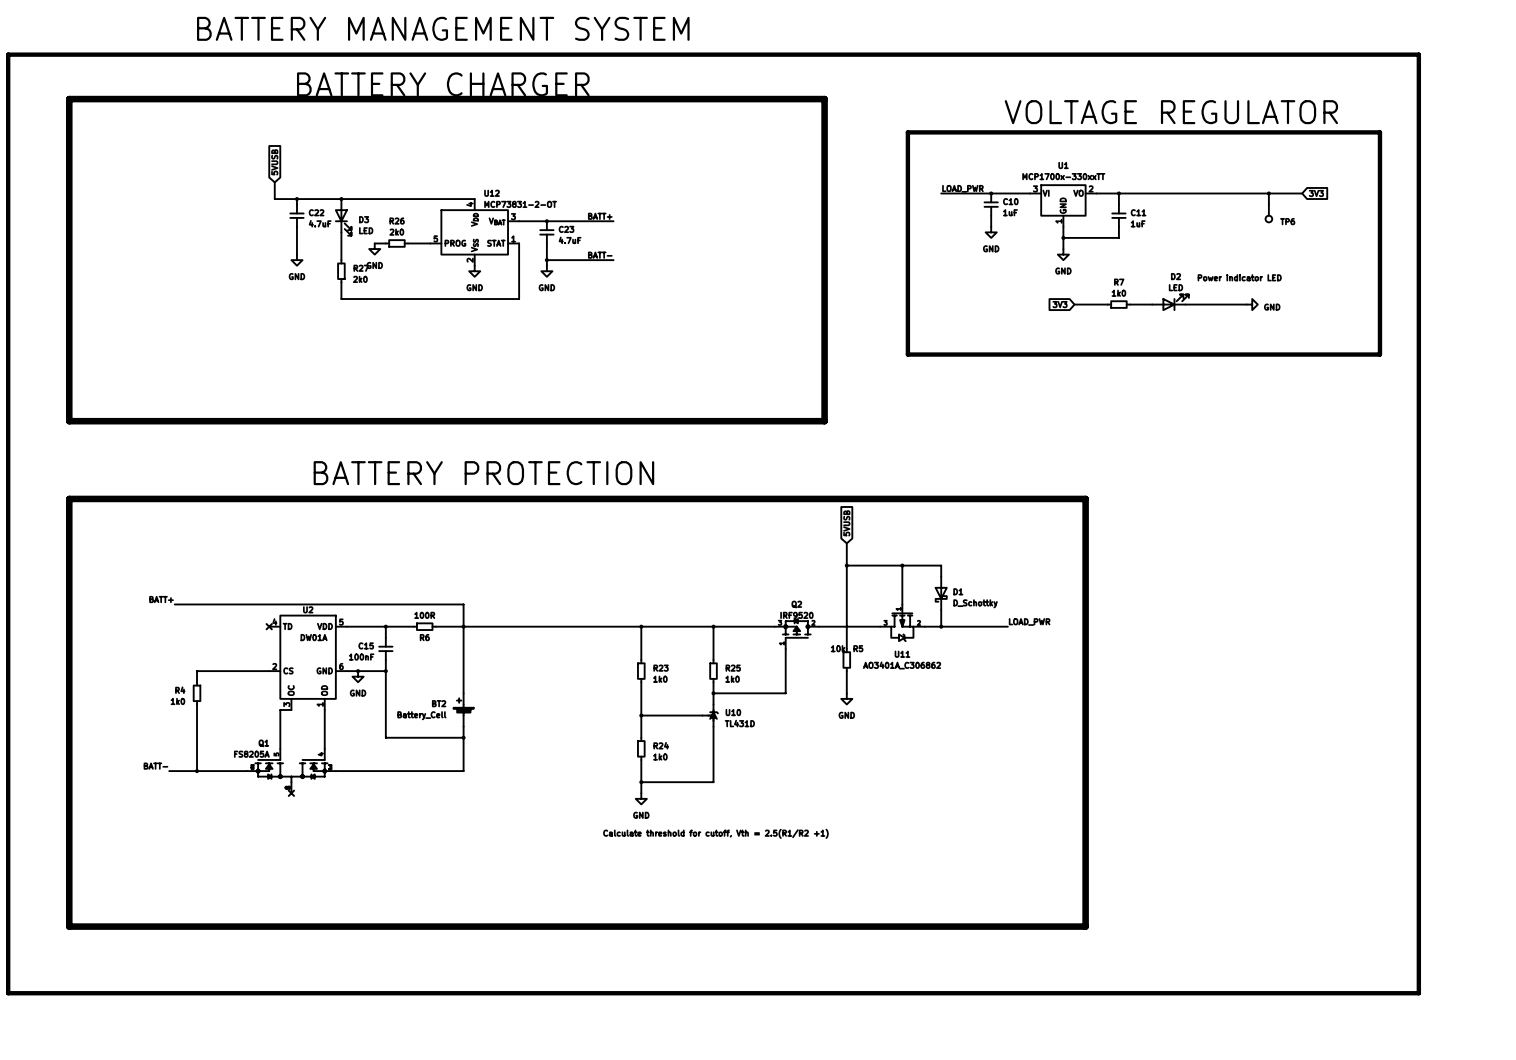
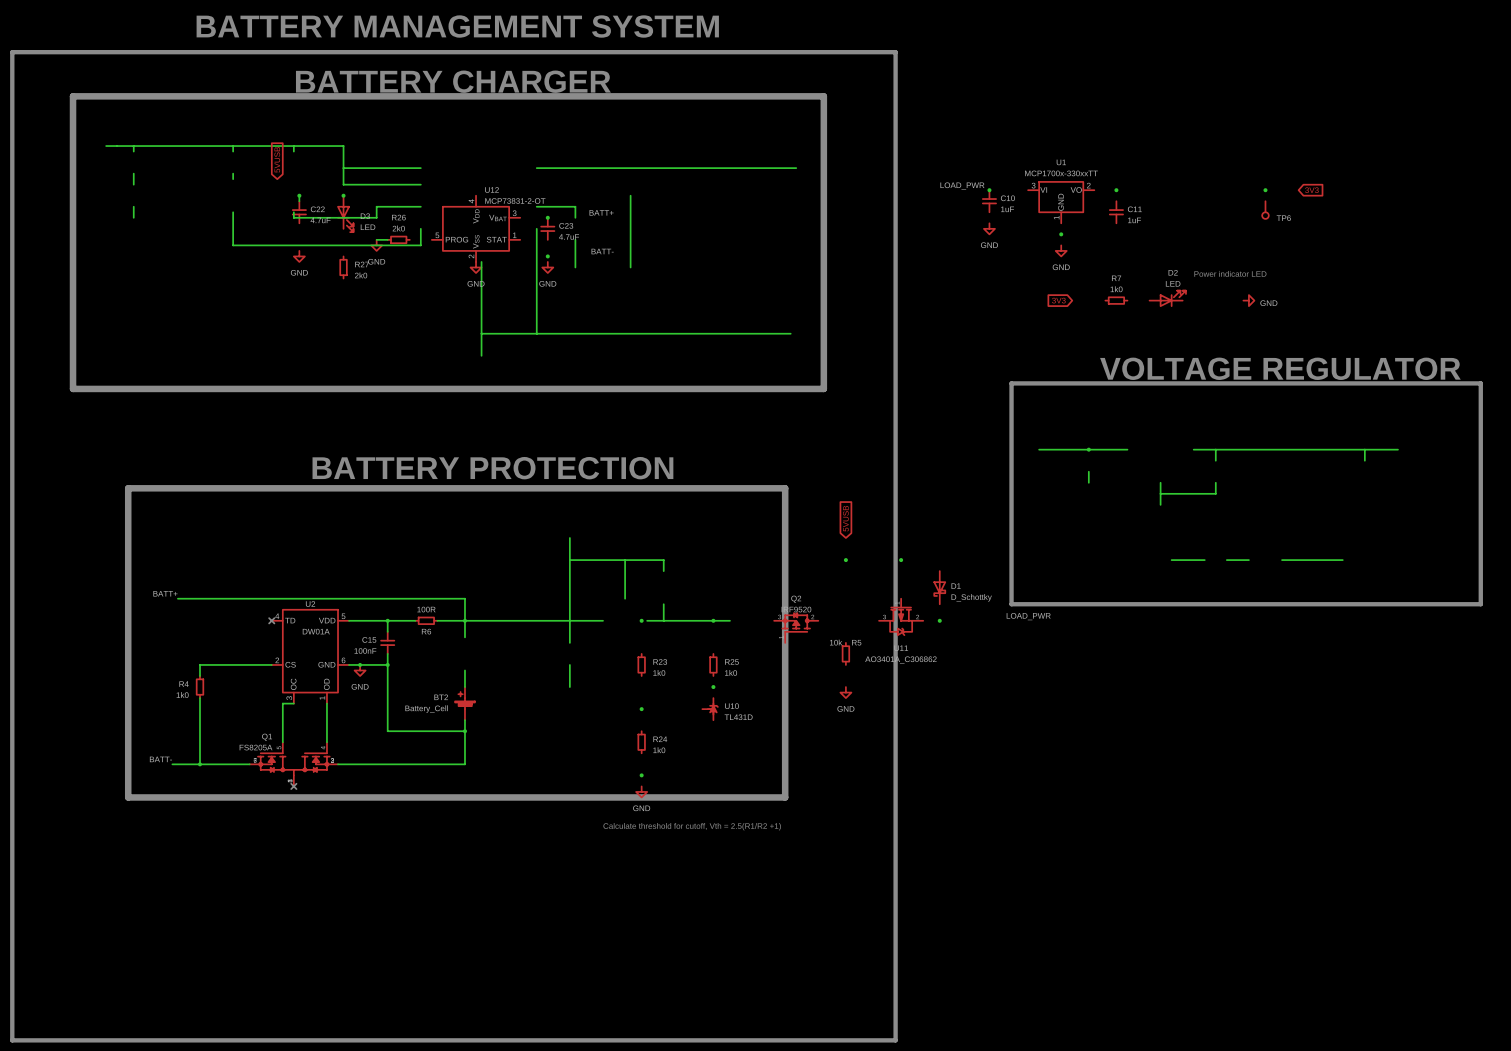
line: (896, 54) (1418, 54) (1418, 993) (8, 993) -> (895, 52) (895, 1040) (12, 1040) (12, 985)
text: VOLTAGE REGULATOR (1171, 112) -> none
line: (907, 132) (1379, 132) (1379, 354) (907, 354) (907, 132) -> none
wire: none -> (106, 146) (343, 146) (343, 184) (420, 184)
wire: none -> (133, 146) (133, 151)
wire: none -> (233, 146) (233, 151)
wire: none -> (293, 146) (293, 151)
wire: none -> (343, 168) (420, 168)
wire: none -> (536, 168) (796, 168)
wire: none -> (133, 173) (133, 184)
wire: none -> (233, 173) (233, 179)
wire: (274, 182) (274, 199) (474, 199) -> none
wire: (941, 193) (1030, 193) -> none
wire: (1096, 193) (1302, 193) -> none
wire: (1118, 193) (1118, 204) -> none
wire: (1268, 193) (1268, 204) -> none
wire: none -> (630, 195) (630, 267)
wire: none -> (133, 206) (133, 217)
wire: none -> (420, 206) (376, 206) (376, 217) (293, 217) (293, 212)
wire: none -> (536, 206) (575, 206) (575, 217)
wire: none -> (233, 212) (233, 245) (420, 245) (420, 228)
wire: (991, 215) (991, 226) -> none
wire: (519, 221) (613, 221) -> none
wire: (296, 226) (296, 254) -> none
wire: (1063, 226) (1063, 249) -> none
wire: (1118, 226) (1118, 237) (1063, 237) -> none
wire: (341, 232) (341, 260) -> none
wire: none -> (536, 228) (536, 333)
wire: (408, 243) (430, 243) -> none
wire: (519, 243) (519, 299) (341, 299) (341, 282) -> none
wire: (546, 243) (546, 265) -> none
wire: none -> (575, 239) (575, 267)
wire: (546, 260) (613, 260) -> none
wire: none -> (481, 261) (481, 355)
wire: (1074, 304) (1107, 304) -> none
wire: (1130, 304) (1152, 304) -> none
wire: (1185, 304) (1246, 304) -> none
wire: none -> (481, 333) (790, 333)
text: none -> VOLTAGE REGULATOR (1280, 368)
line: none -> (1011, 383) (1480, 383) (1480, 604) (1011, 604) (1011, 383)
line: (69, 393) (69, 421) (824, 421) (824, 393) -> (73, 388) (823, 388)
wire: none -> (1039, 449) (1127, 449)
junction: none -> (1088, 449)
wire: none -> (1193, 449) (1397, 449)
wire: none -> (1215, 449) (1215, 460)
wire: none -> (1364, 449) (1364, 460)
wire: none -> (1088, 471) (1088, 482)
wire: none -> (1160, 482) (1160, 504)
wire: none -> (1215, 482) (1215, 493) (1160, 493)
line: none -> (128, 488) (785, 488) (785, 797) (128, 797) (128, 488)
line: (69, 498) (1085, 498) (1085, 926) (69, 926) (69, 498) -> none
wire: none -> (569, 537) (569, 642)
wire: (846, 543) (846, 648) -> none
wire: none -> (569, 560) (663, 560) (663, 571)
wire: none -> (625, 560) (625, 598)
wire: (846, 565) (941, 565) (941, 576) -> none
wire: (902, 565) (902, 604) -> none
wire: none -> (1171, 560) (1204, 560)
wire: none -> (1226, 560) (1248, 560)
wire: none -> (1282, 560) (1342, 560)
wire: none -> (663, 604) (663, 620)
wire: (941, 610) (941, 626) -> none
wire: (602, 626) (646, 626) -> none
wire: (641, 626) (641, 660) -> none
wire: (713, 626) (713, 660) -> none
wire: (730, 626) (774, 626) -> none
wire: (819, 626) (880, 626) -> none
wire: (924, 626) (1007, 626) -> none
wire: (463, 643) (463, 676) -> none
wire: (785, 648) (785, 693) (713, 693) -> none
wire: none -> (569, 664) (569, 687)
wire: (846, 671) (846, 693) -> none
wire: (641, 682) (641, 737) -> none
wire: (713, 682) (713, 704) -> none
wire: (641, 715) (702, 715) -> none
wire: (713, 726) (713, 782) (641, 782) -> none
wire: (641, 759) (641, 793) -> none

